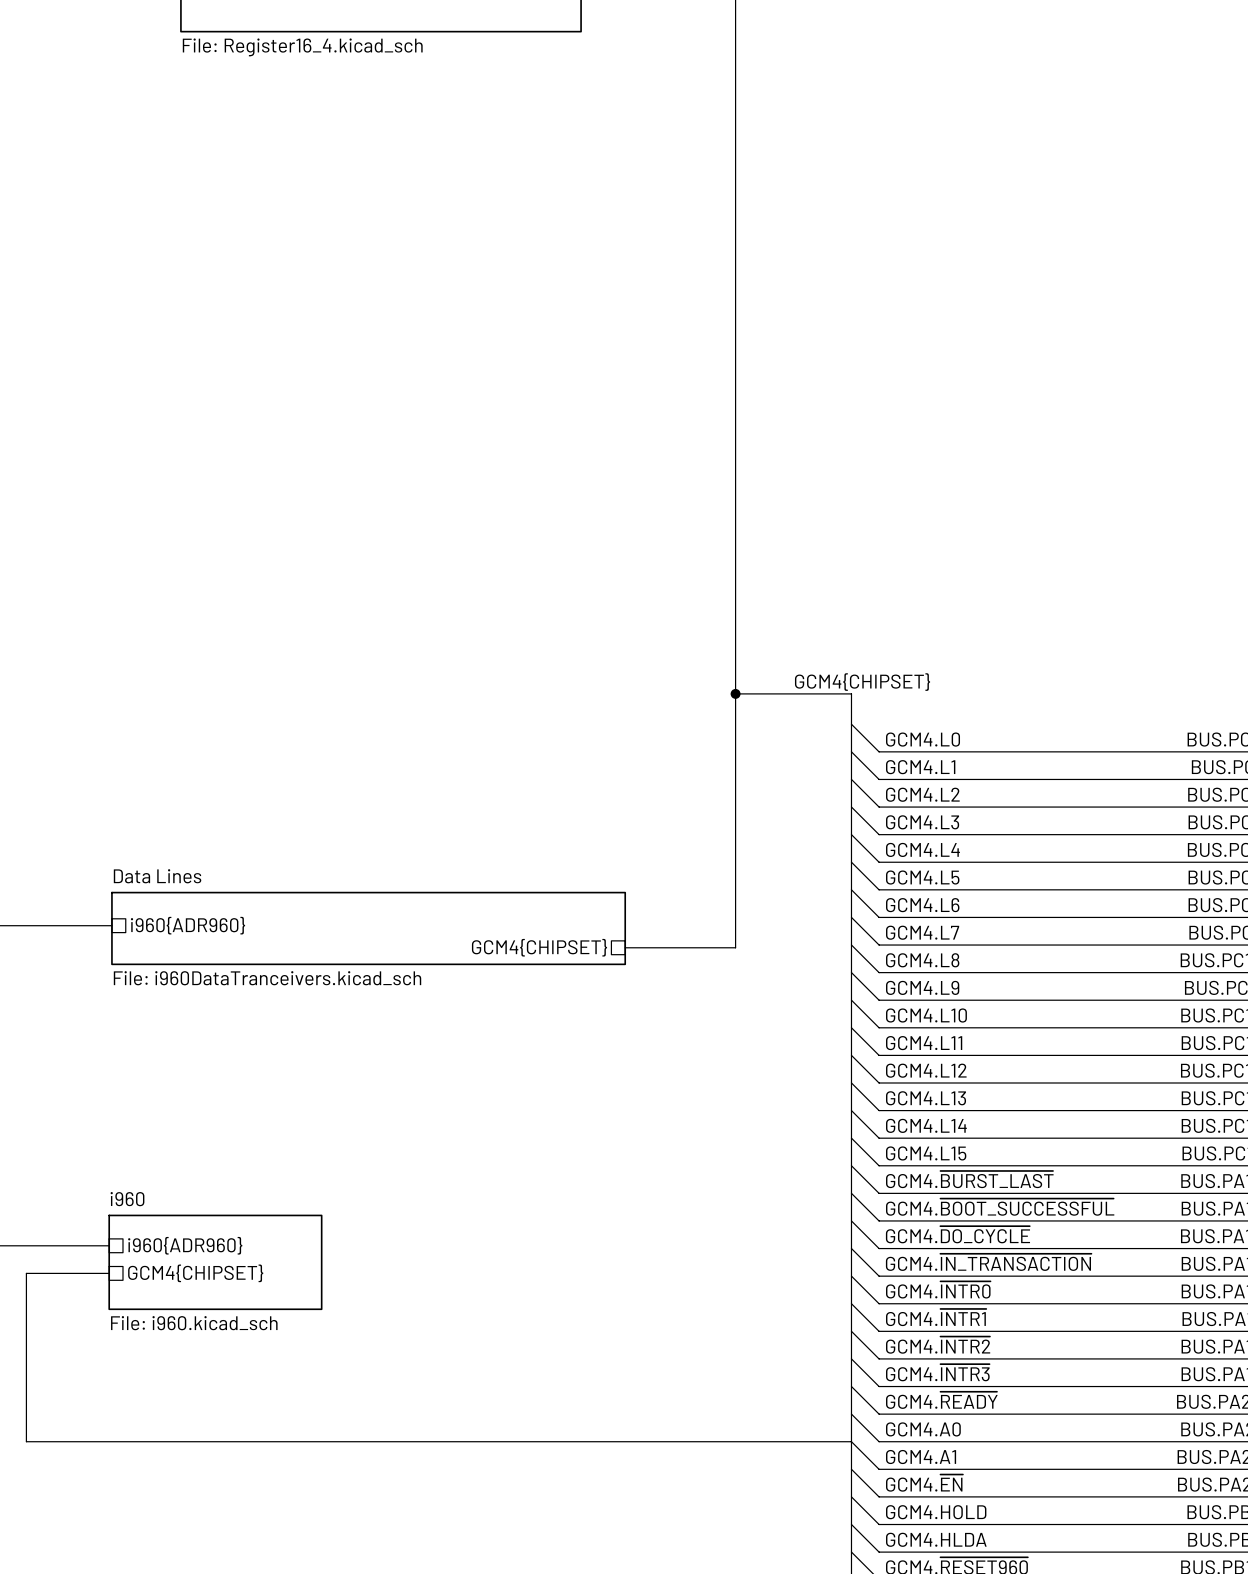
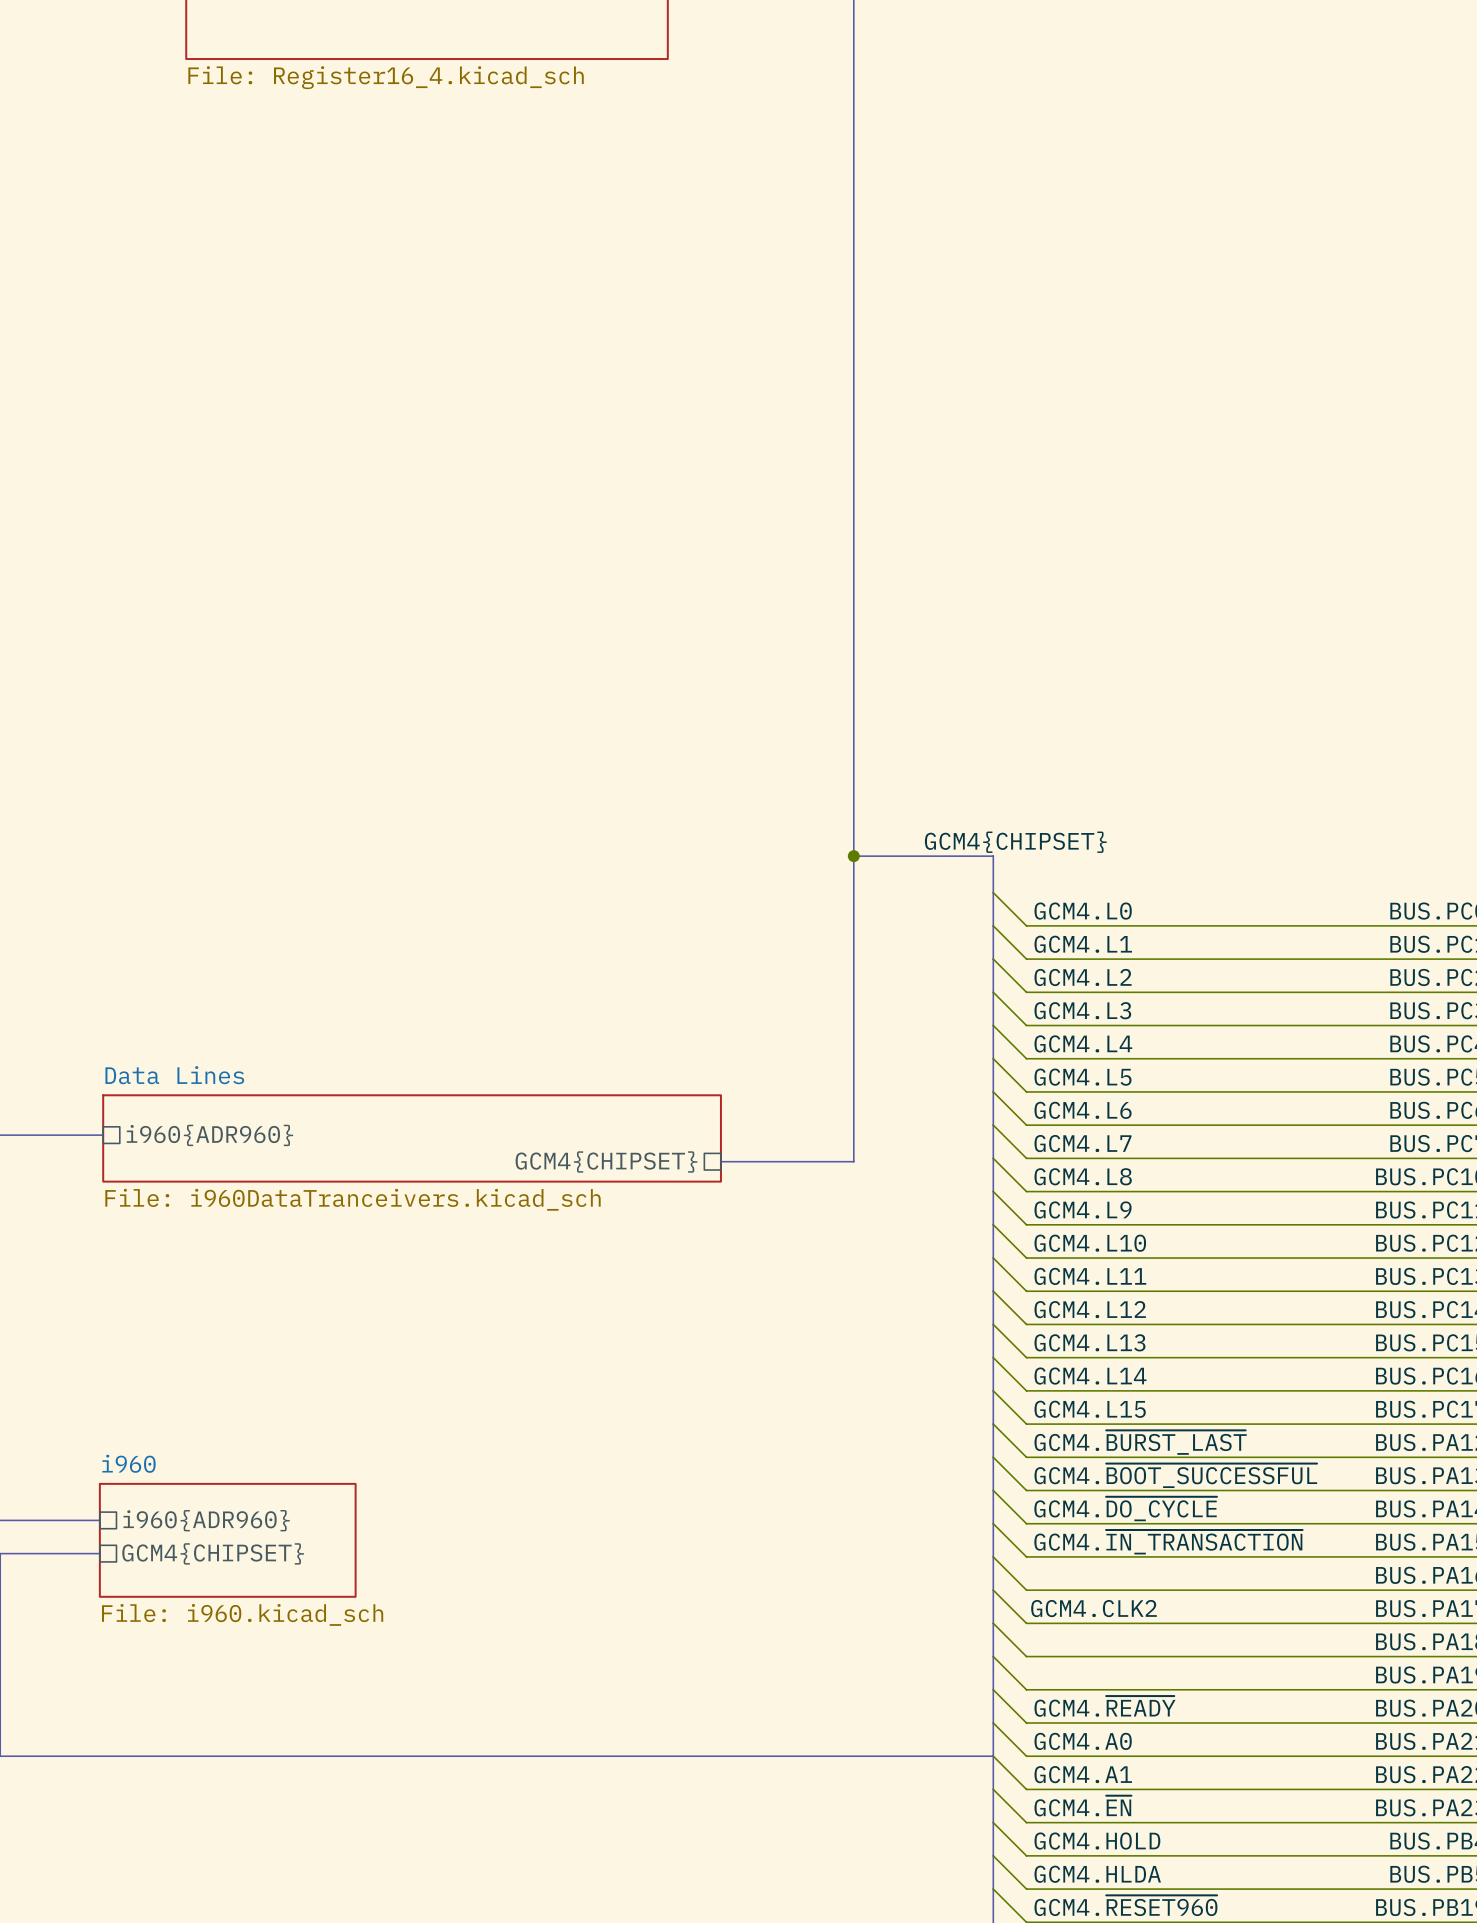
label: GCM4.~{INTR0} (938, 1289) -> none
label: GCM4.~{INTR1} (936, 1317) -> GCM4.CLK2 (1094, 1608)
label: GCM4.~{INTR2} (938, 1345) -> none
label: GCM4.~{INTR3} (937, 1372) -> none

